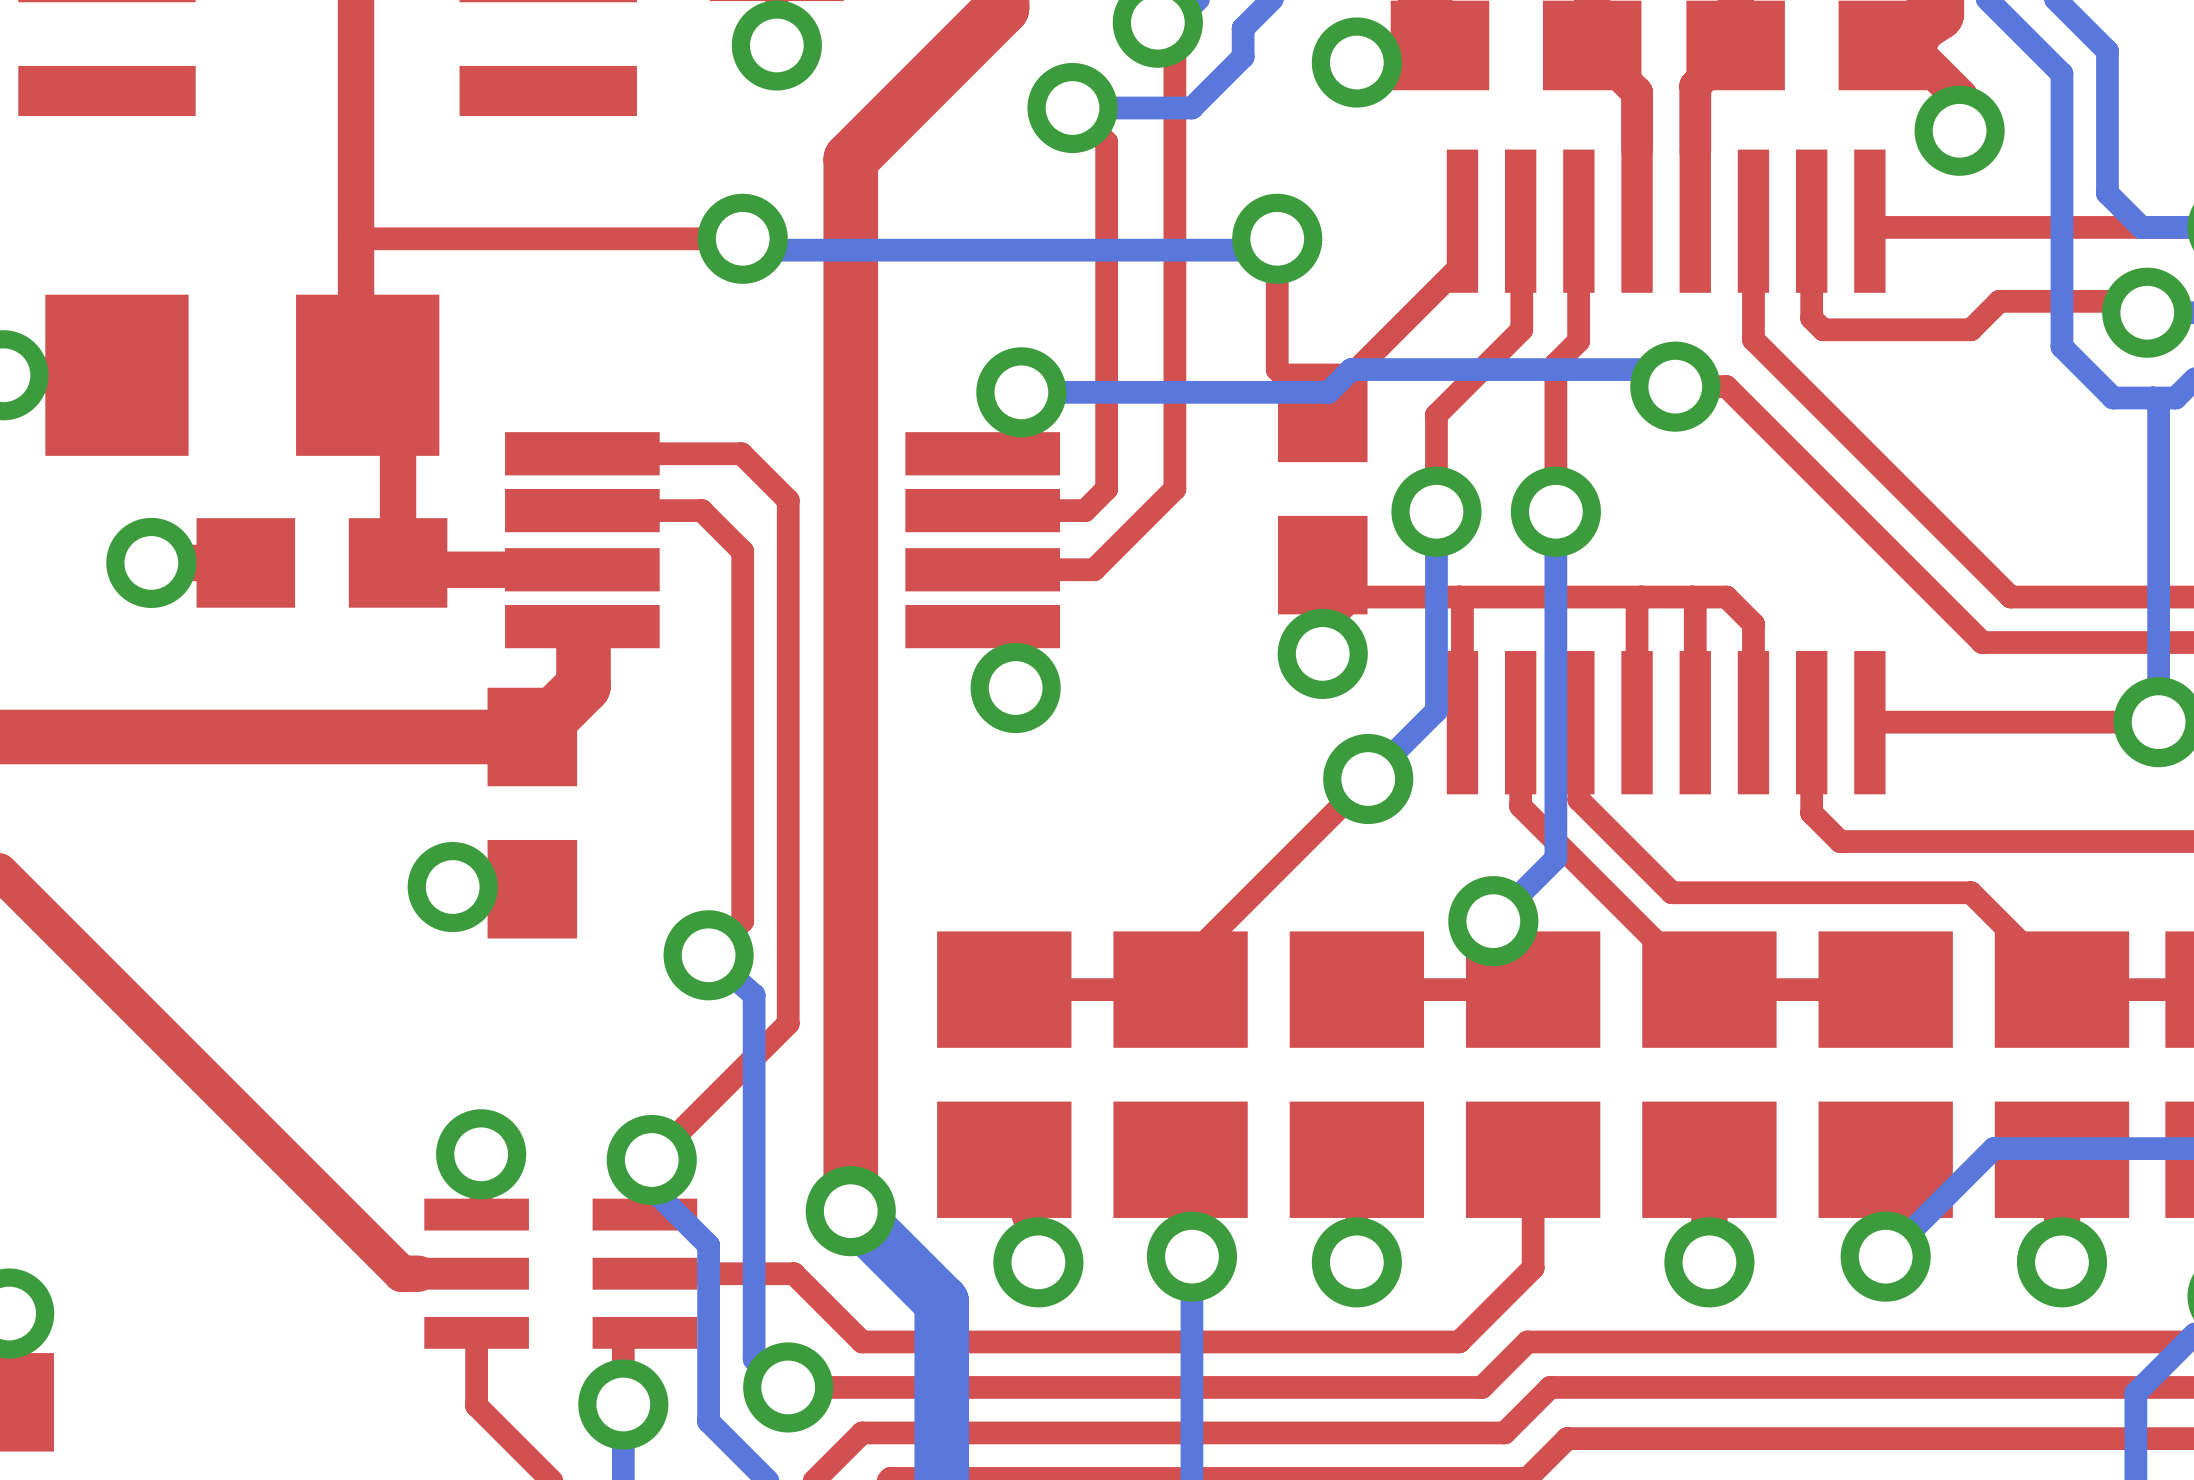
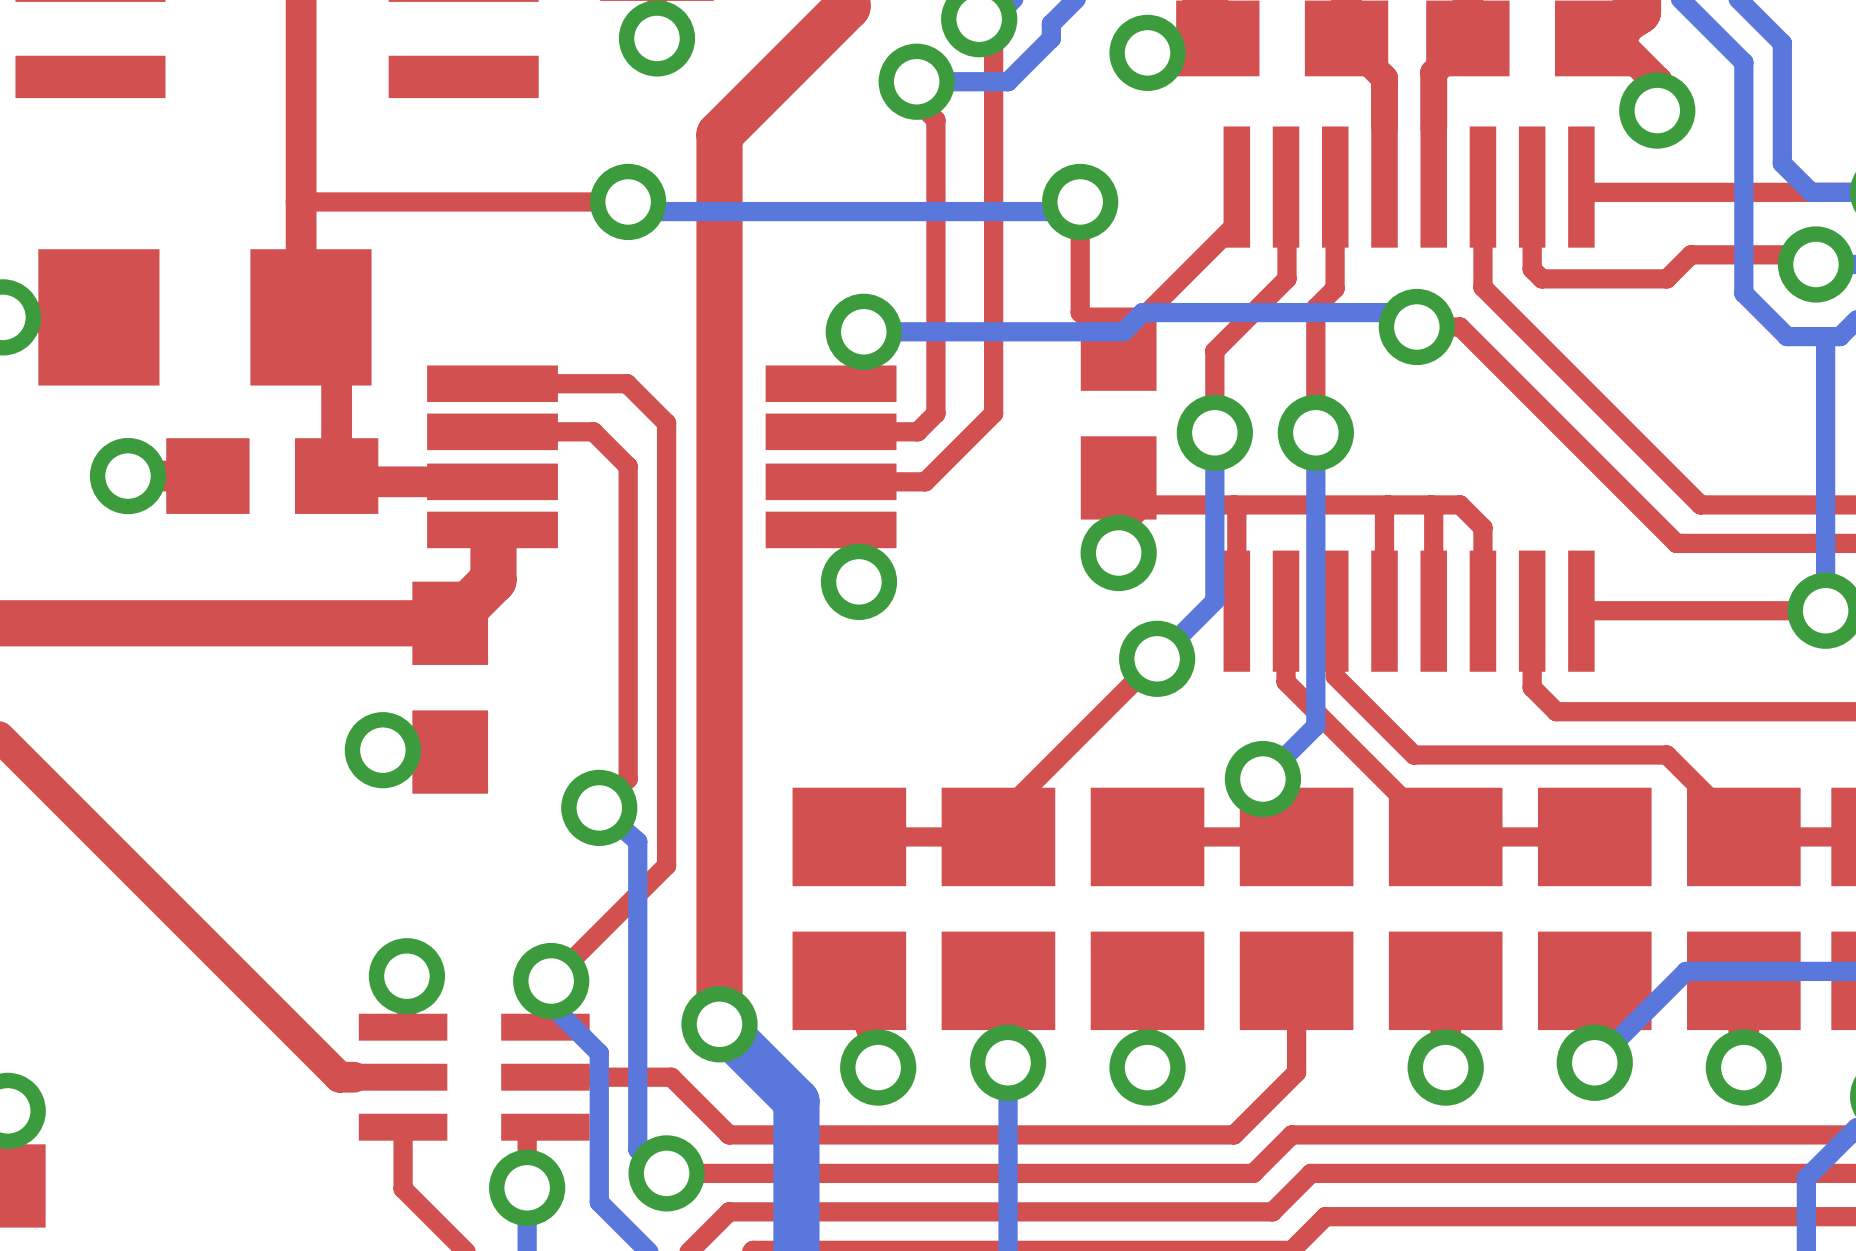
bottom track: (1243, 45) (1243, 56) (1191, 108) (1072, 108) -> (1051, 38) (1008, 81) (916, 81)
via position: (1072, 108) -> (916, 81)

